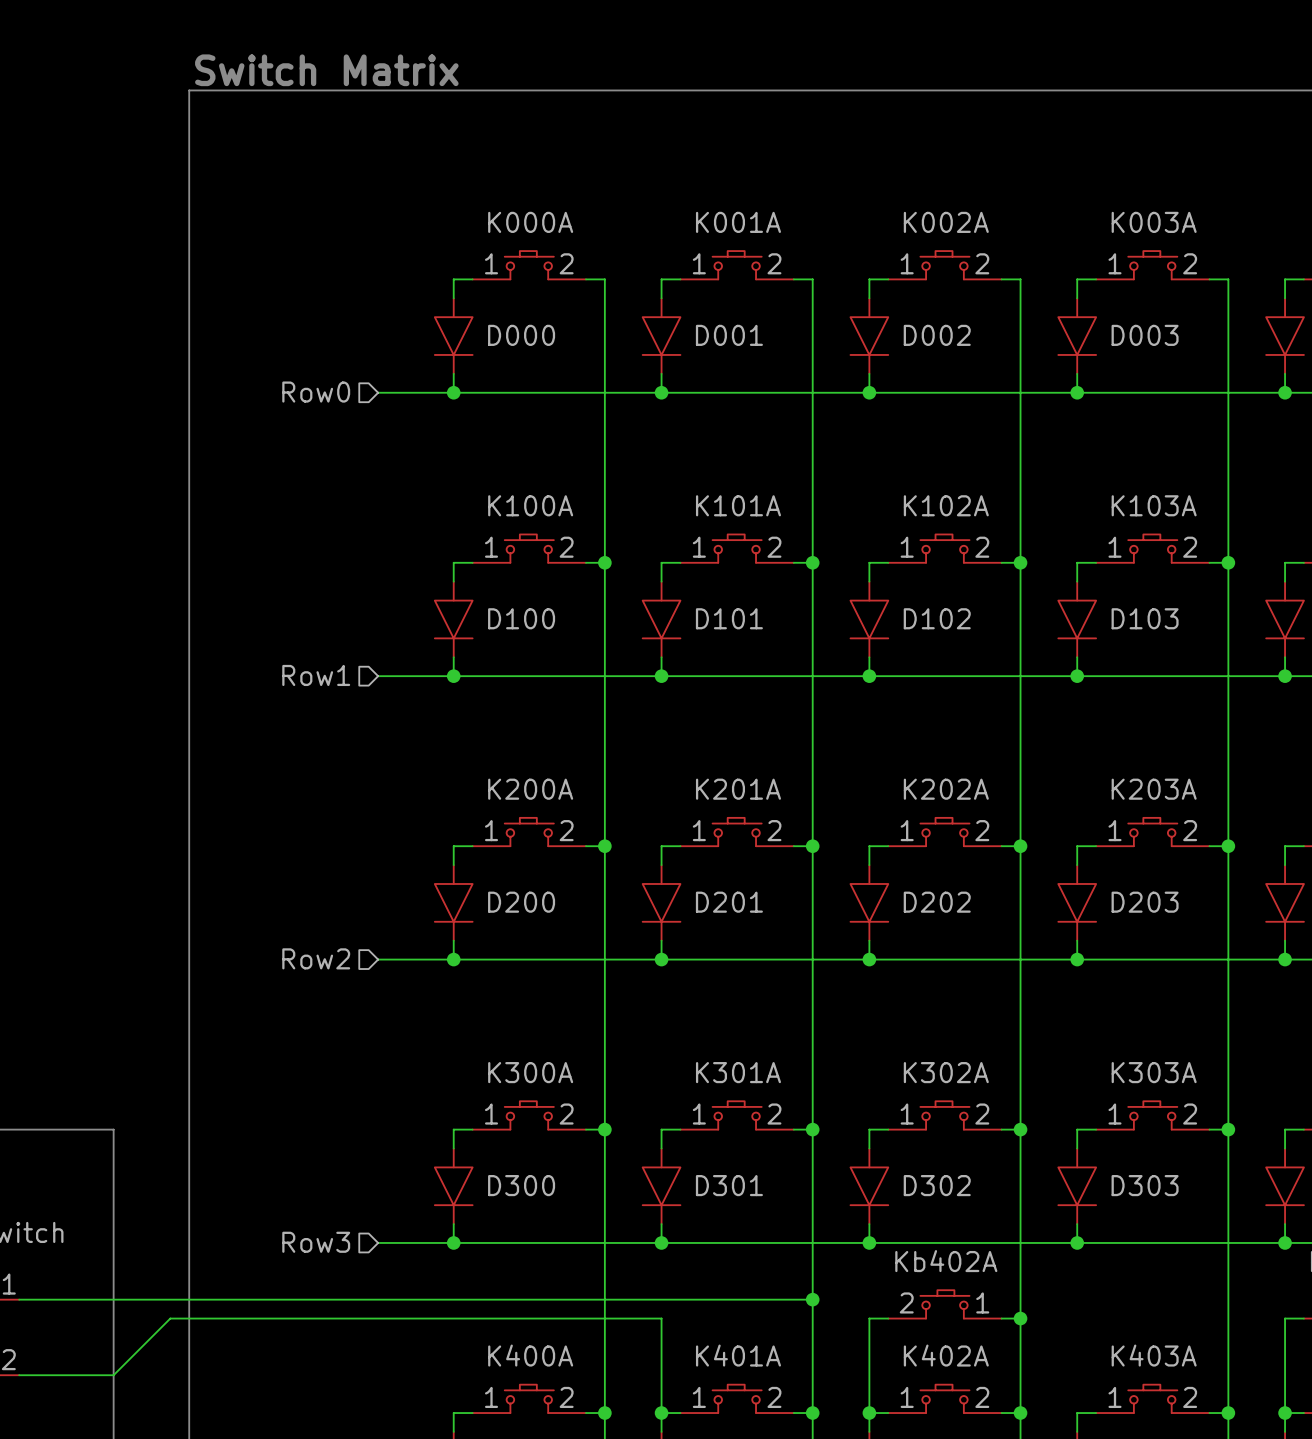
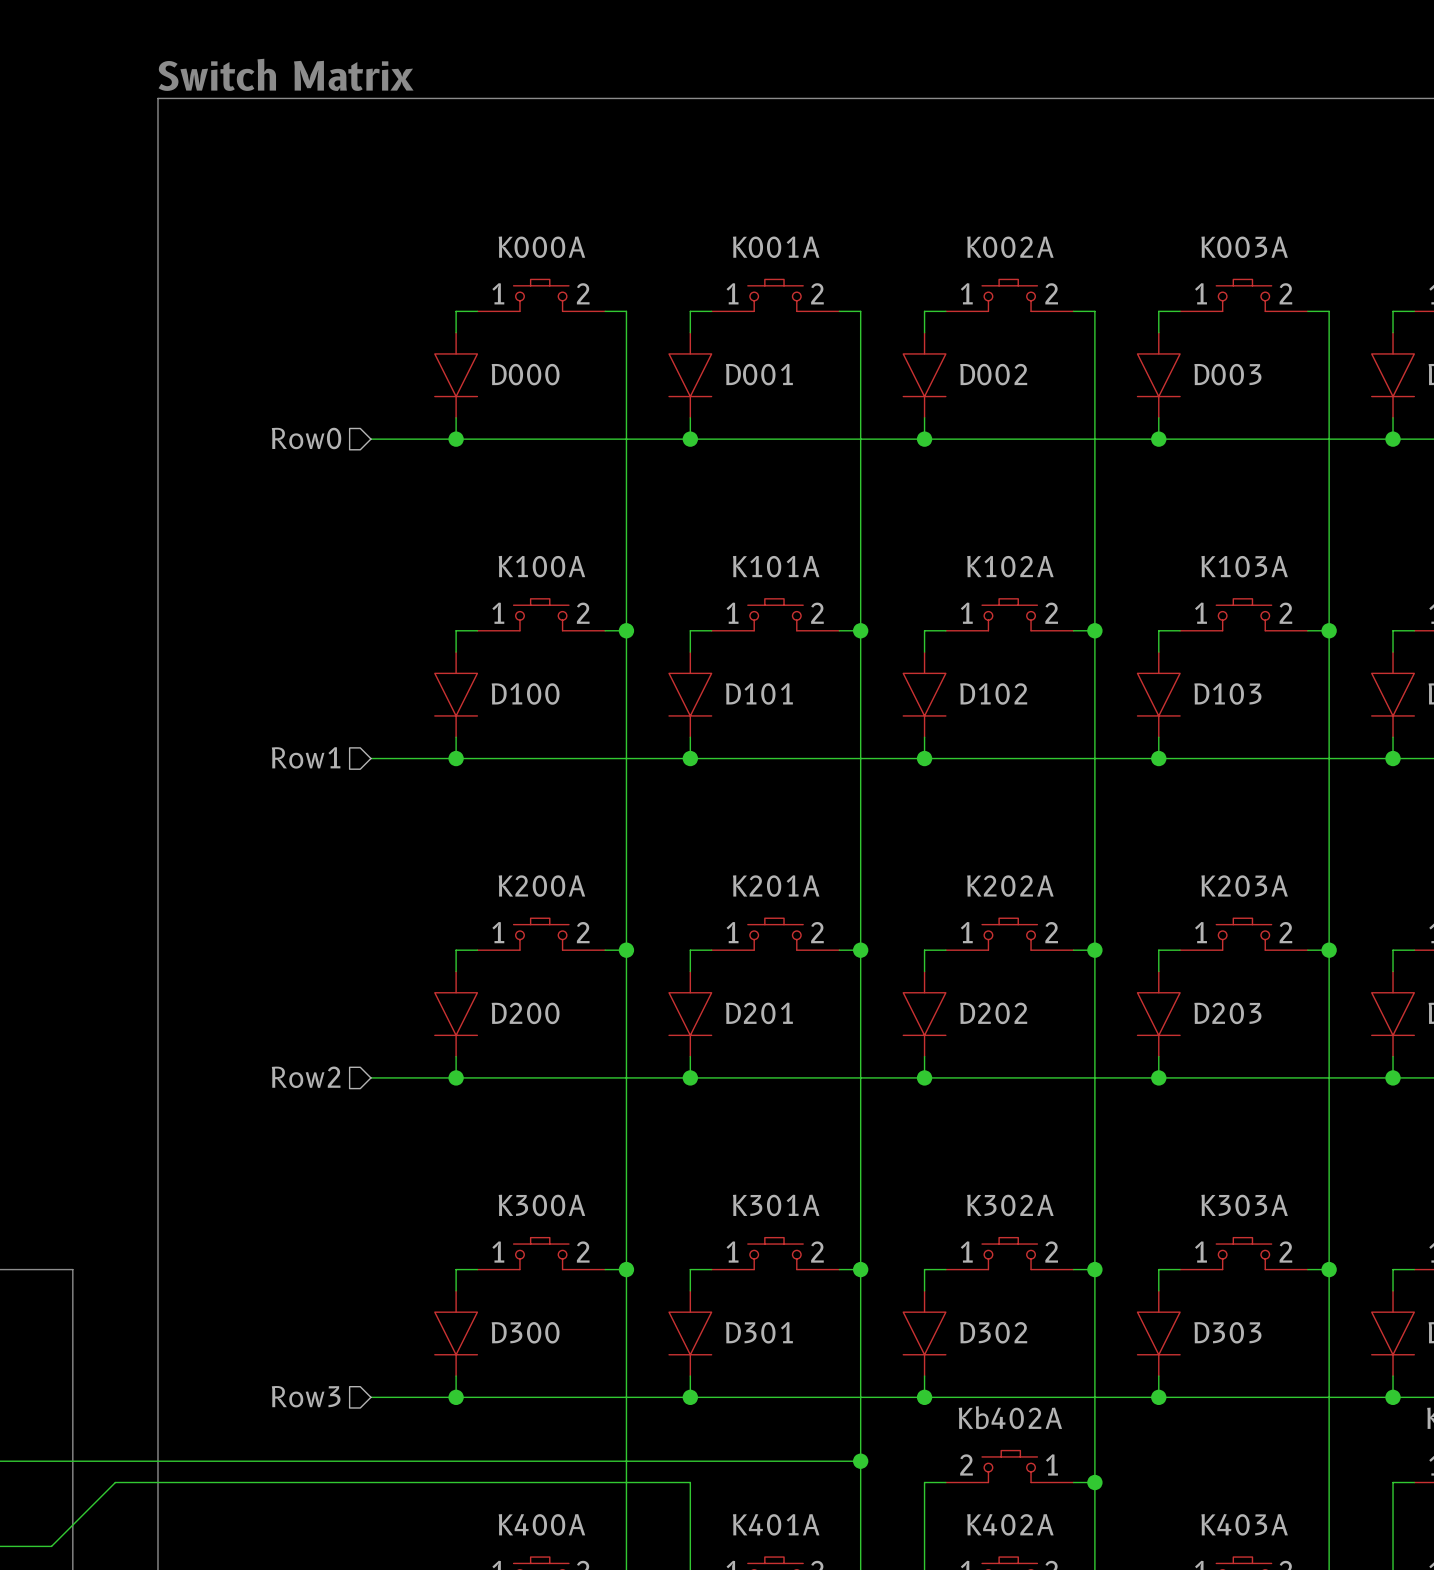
wire: (170, 1318) (113, 1375) (94, 1375) -> (136, 1482) (115, 1482) (51, 1546)

